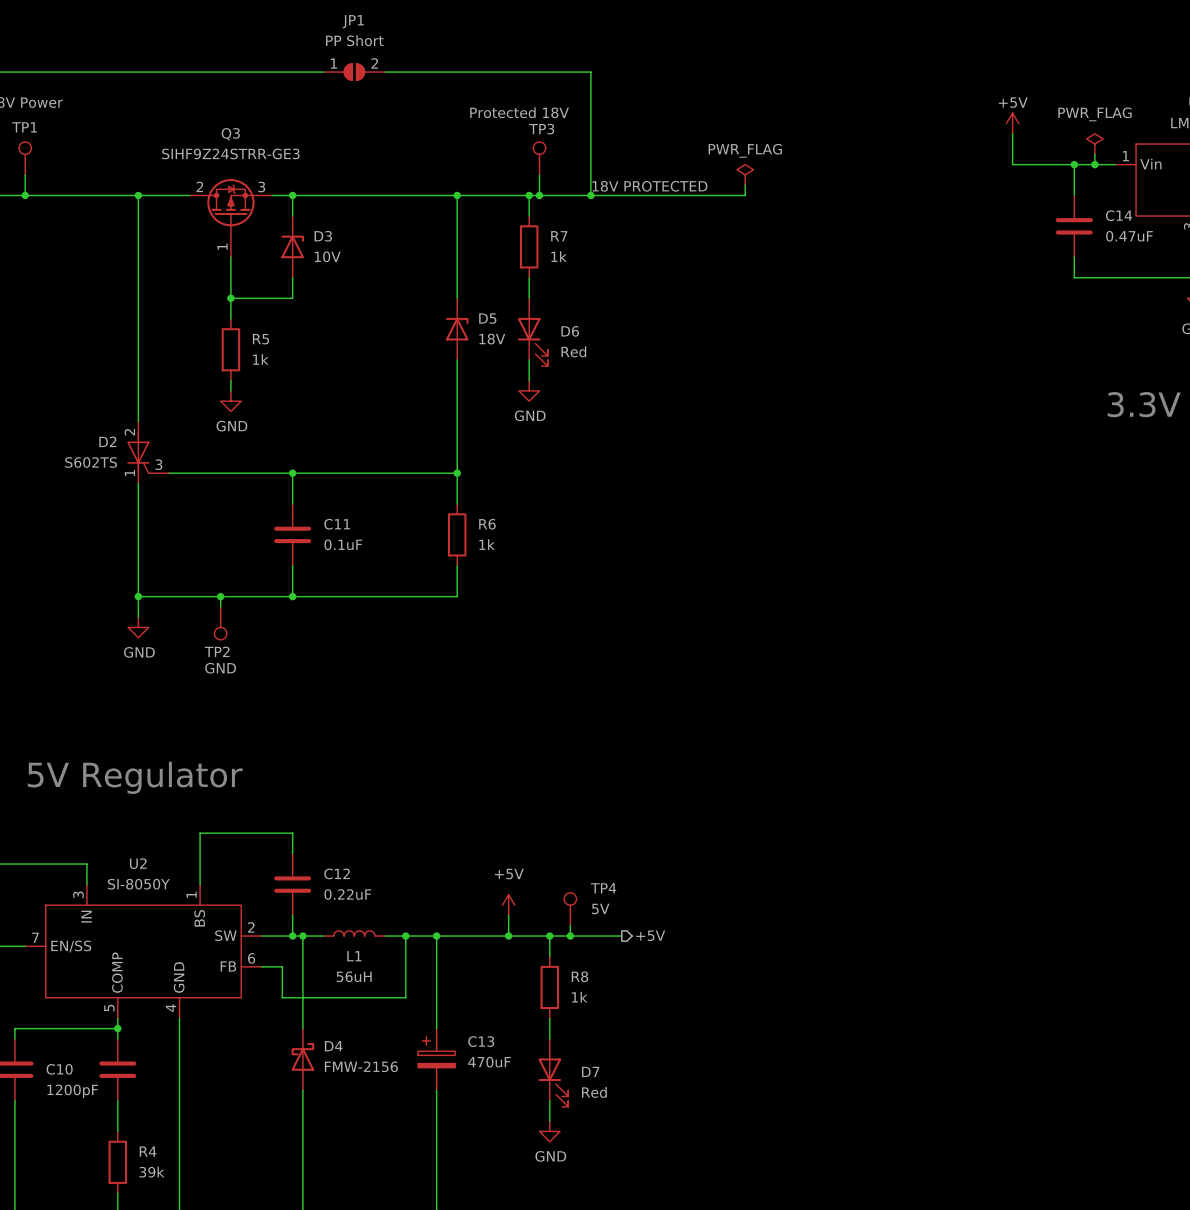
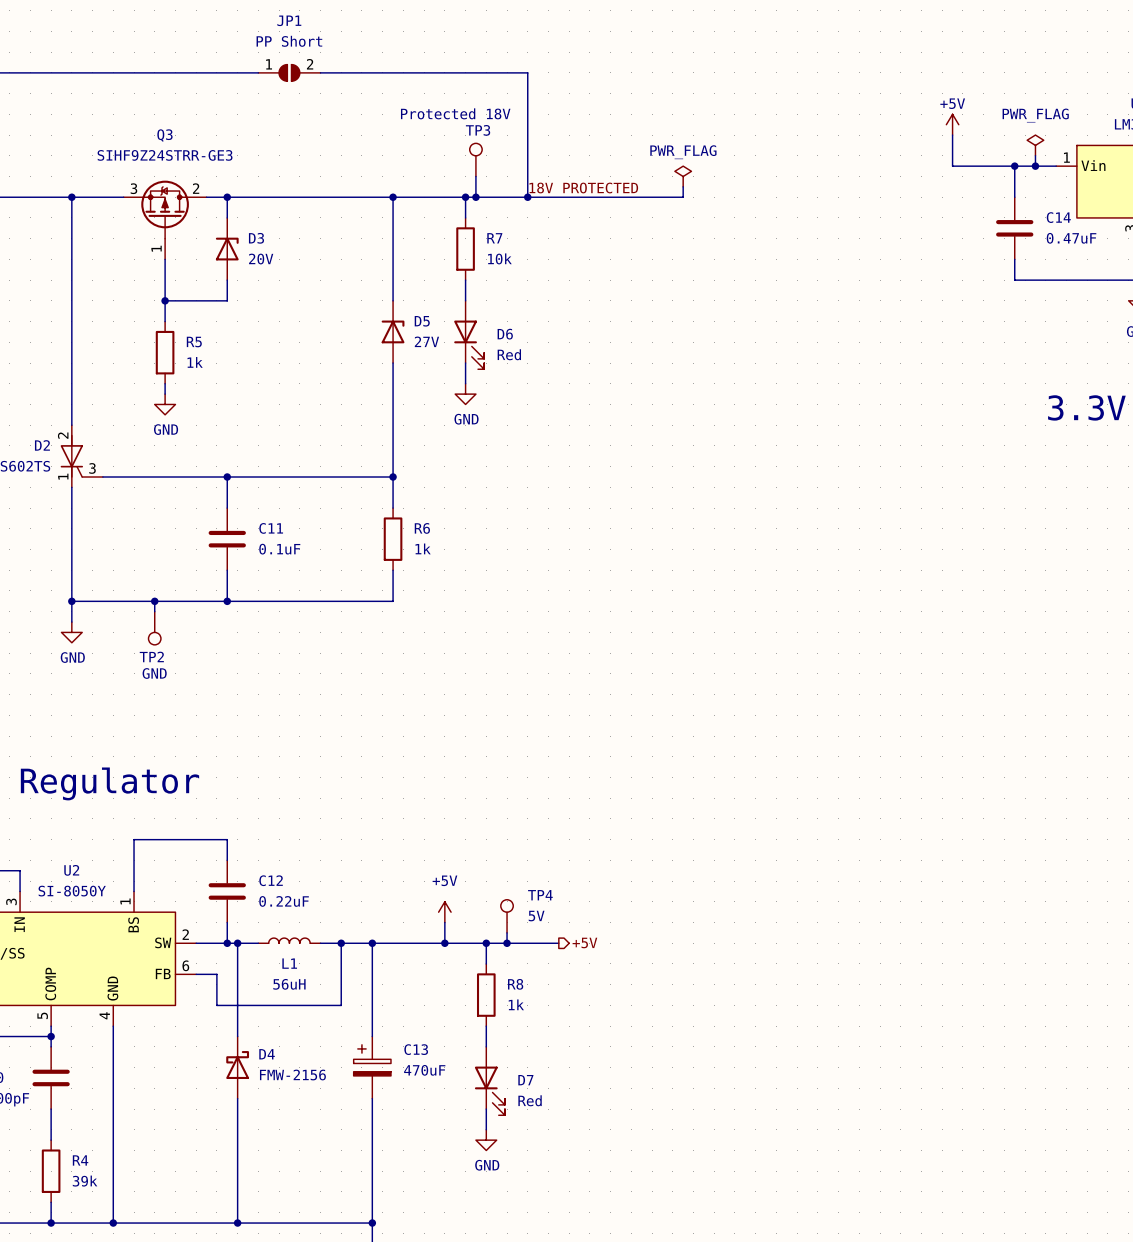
Q3 flip: as is (230, 207) -> left-right (165, 209)
D3 value: 10V (327, 256) -> 20V (261, 259)
R7 value: 1k (559, 256) -> 10k (499, 258)
D5 value: 18V (492, 339) -> 27V (426, 341)

